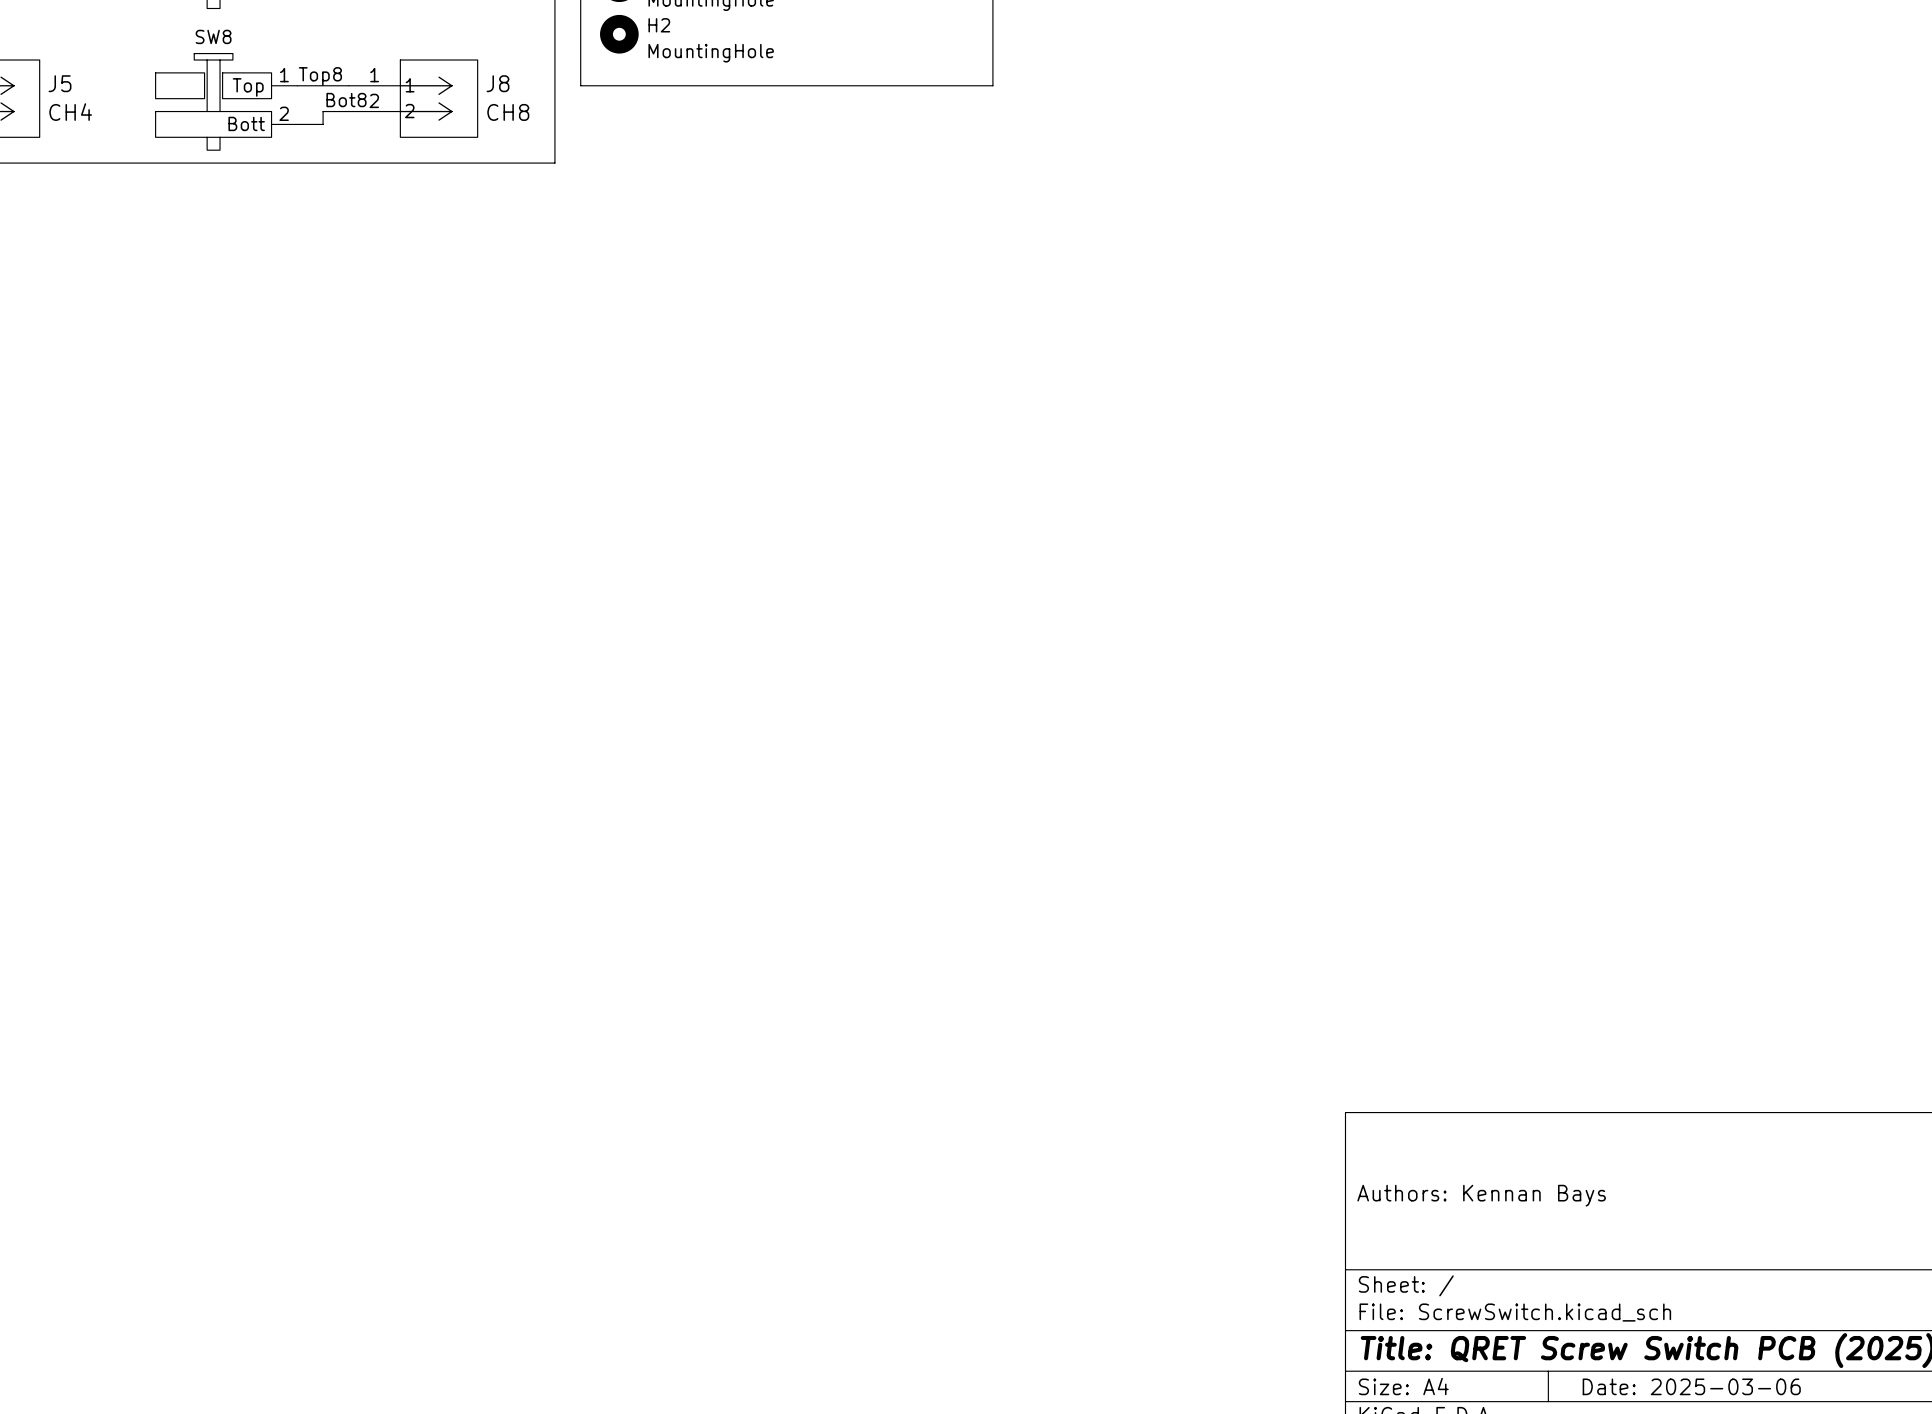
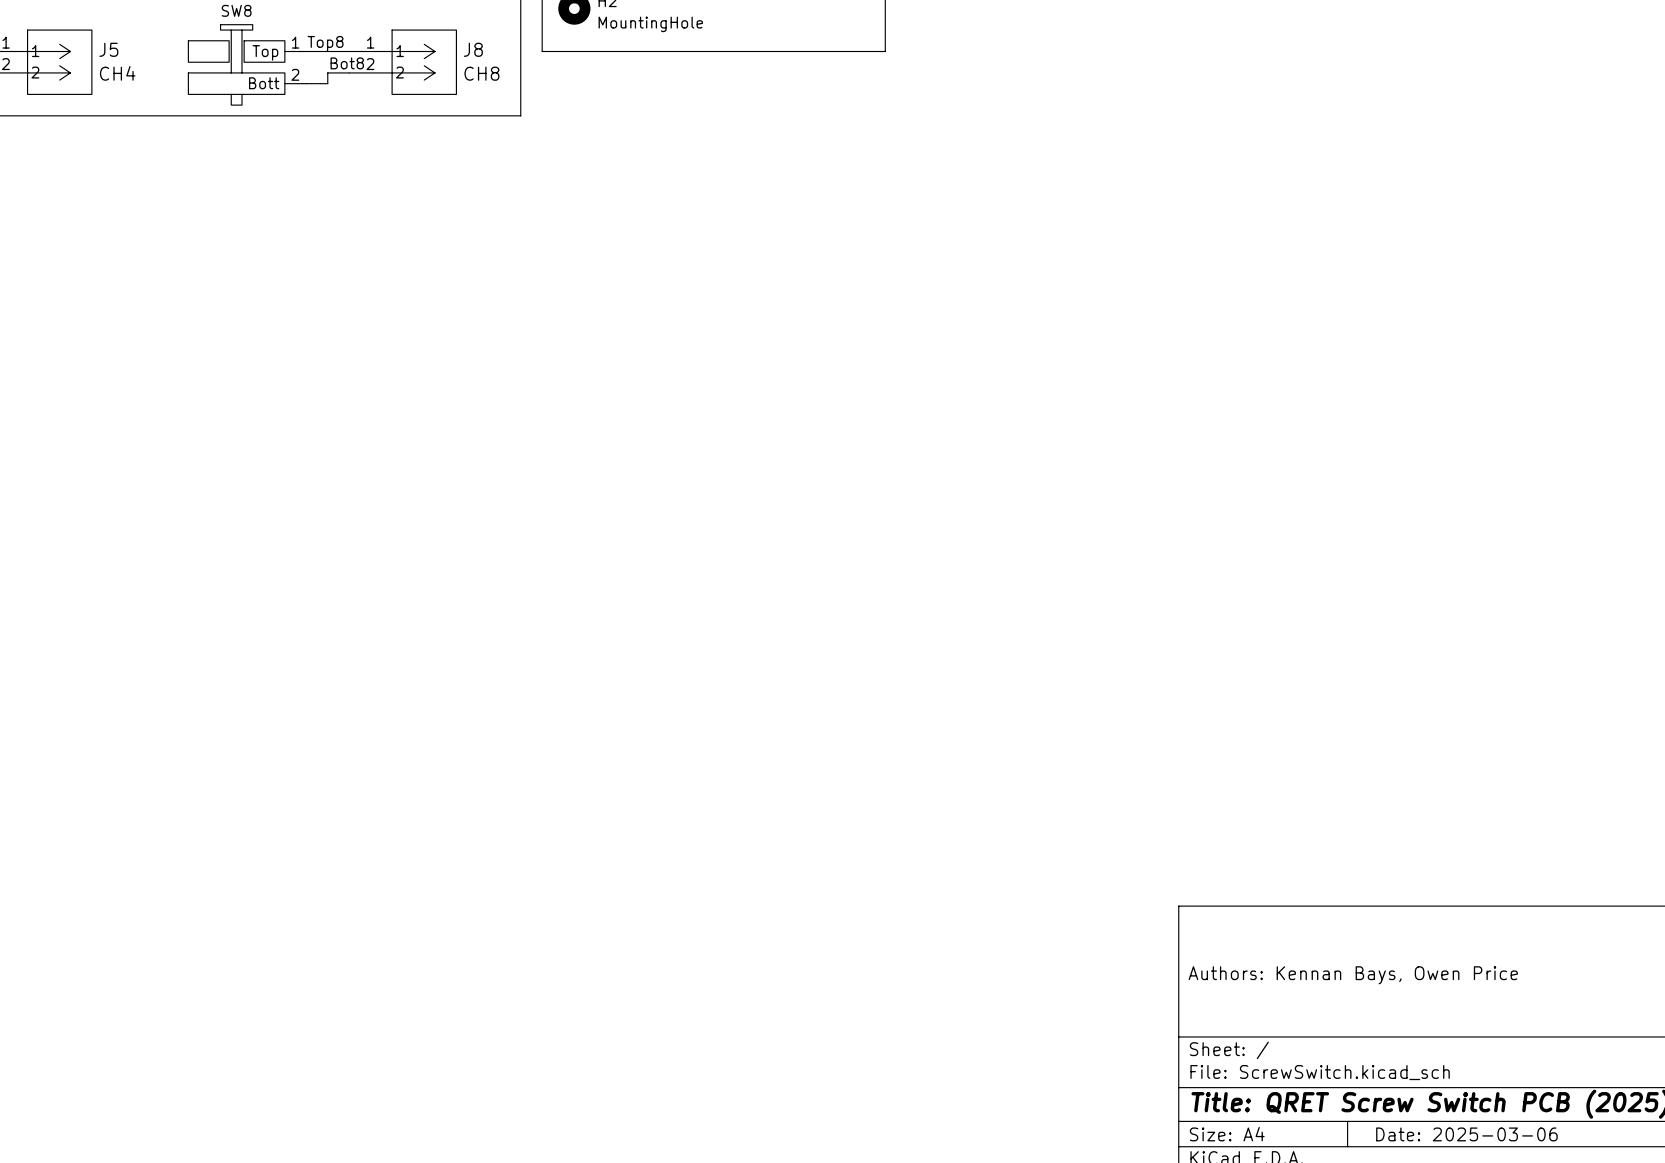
title block: Authors: Kennan Bays (1481, 1195) -> Authors: Kennan Bays, Owen Price (1353, 975)

